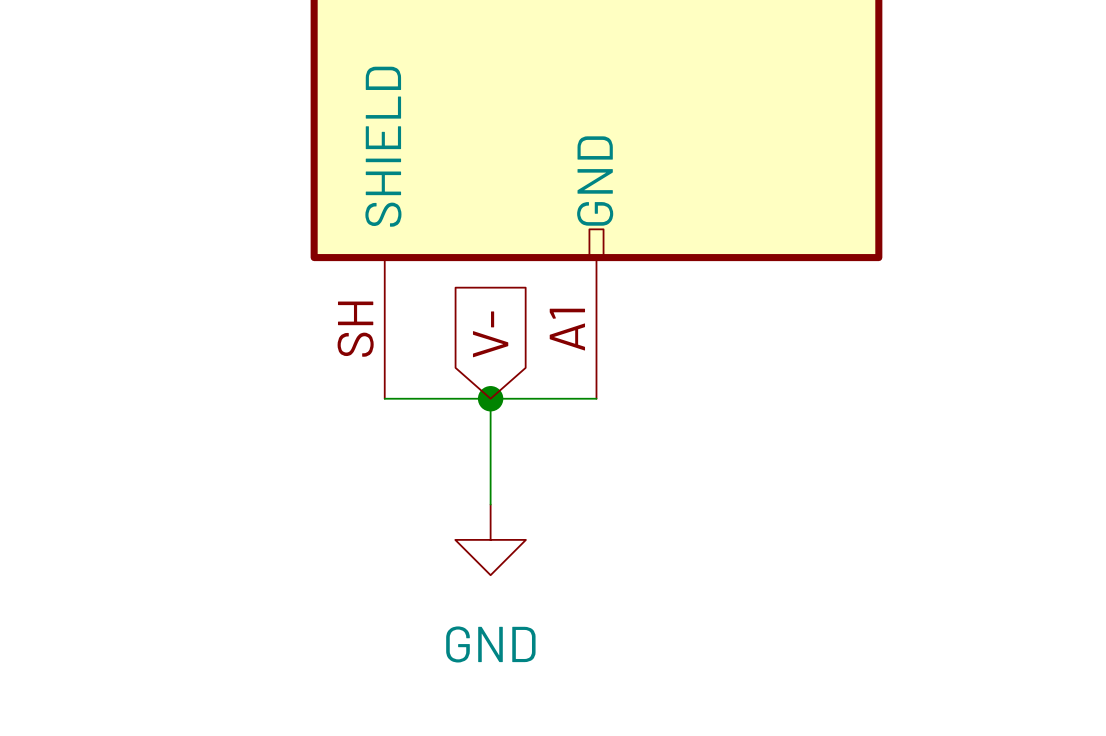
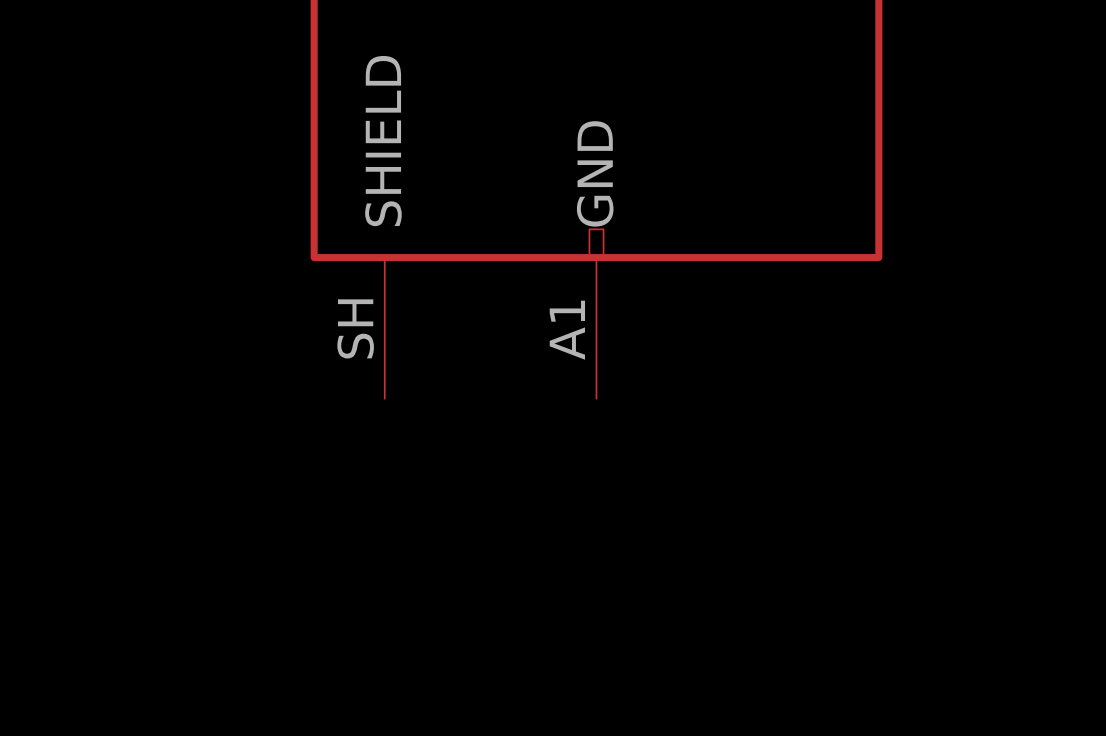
global label: V- (490, 334) -> none
wire: (384, 398) (596, 398) -> none
wire: (490, 398) (490, 504) -> none
junction: (490, 398) -> none
power symbol: GND (490, 539) -> none

